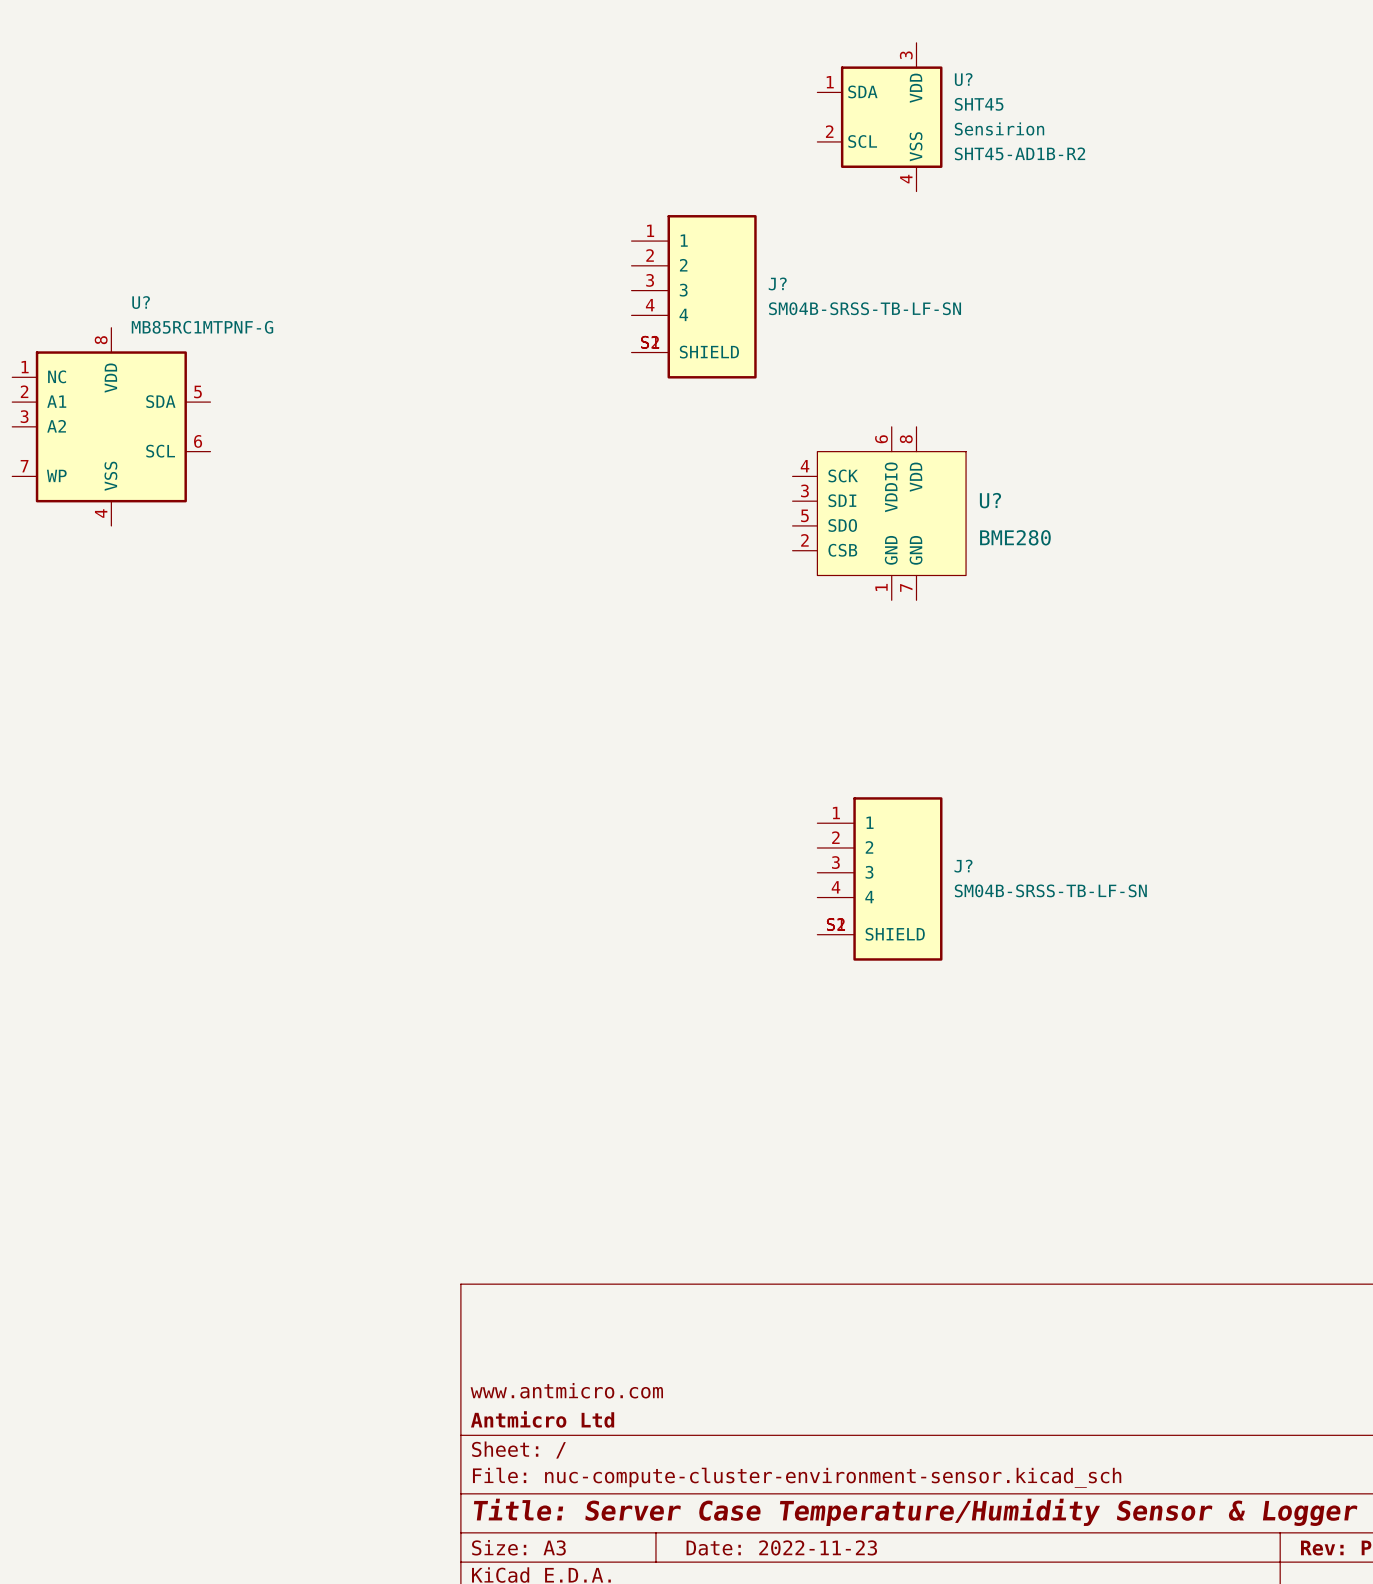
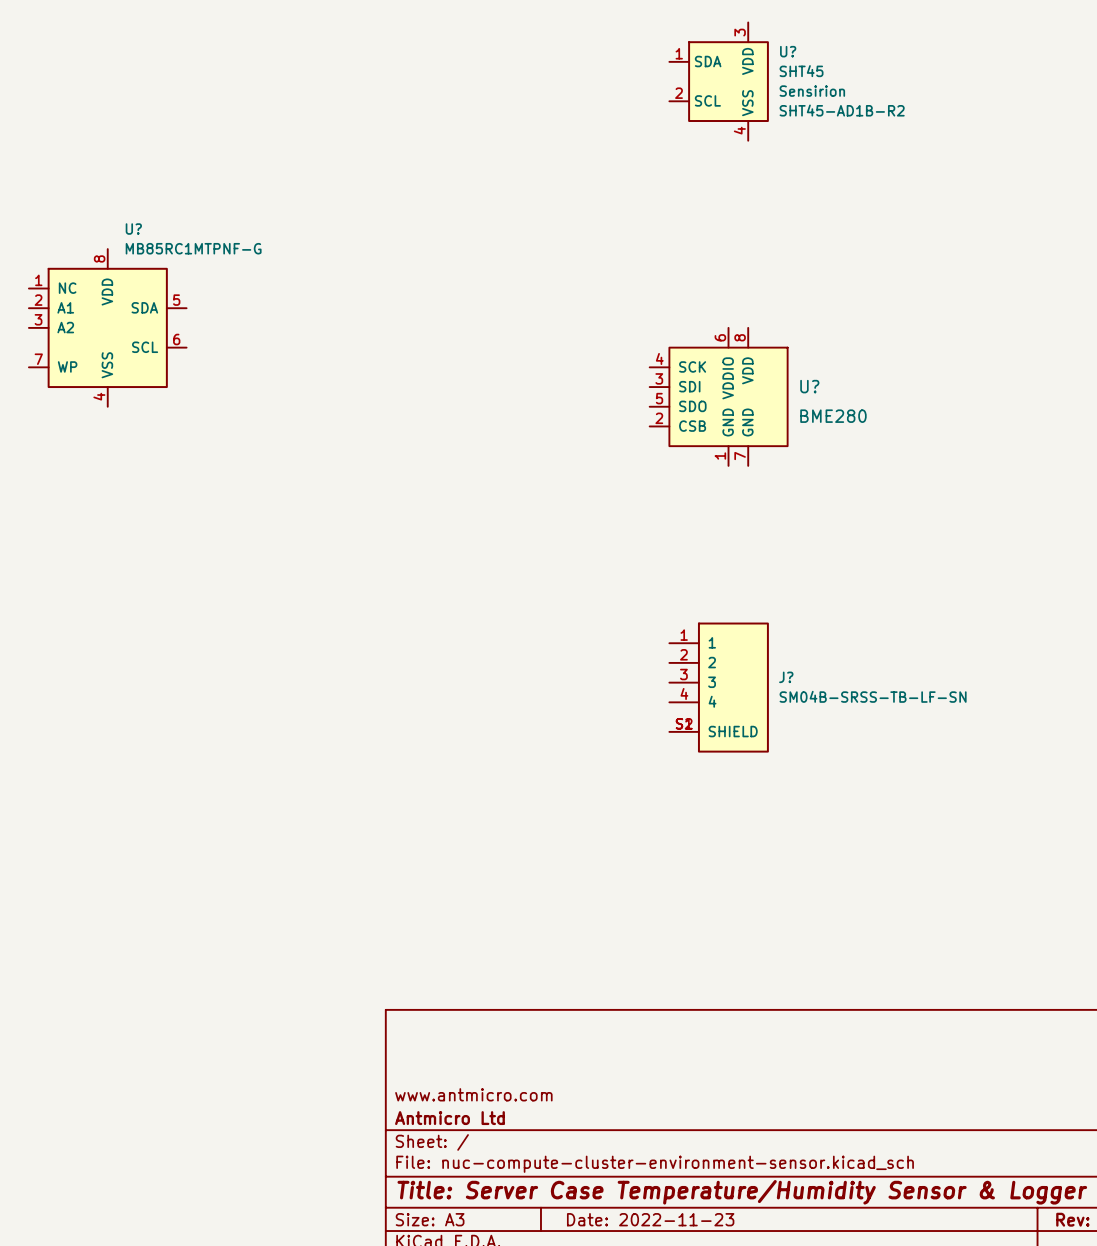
J?: SM04B-SRSS-TB-LF-SN (694, 296) -> none

